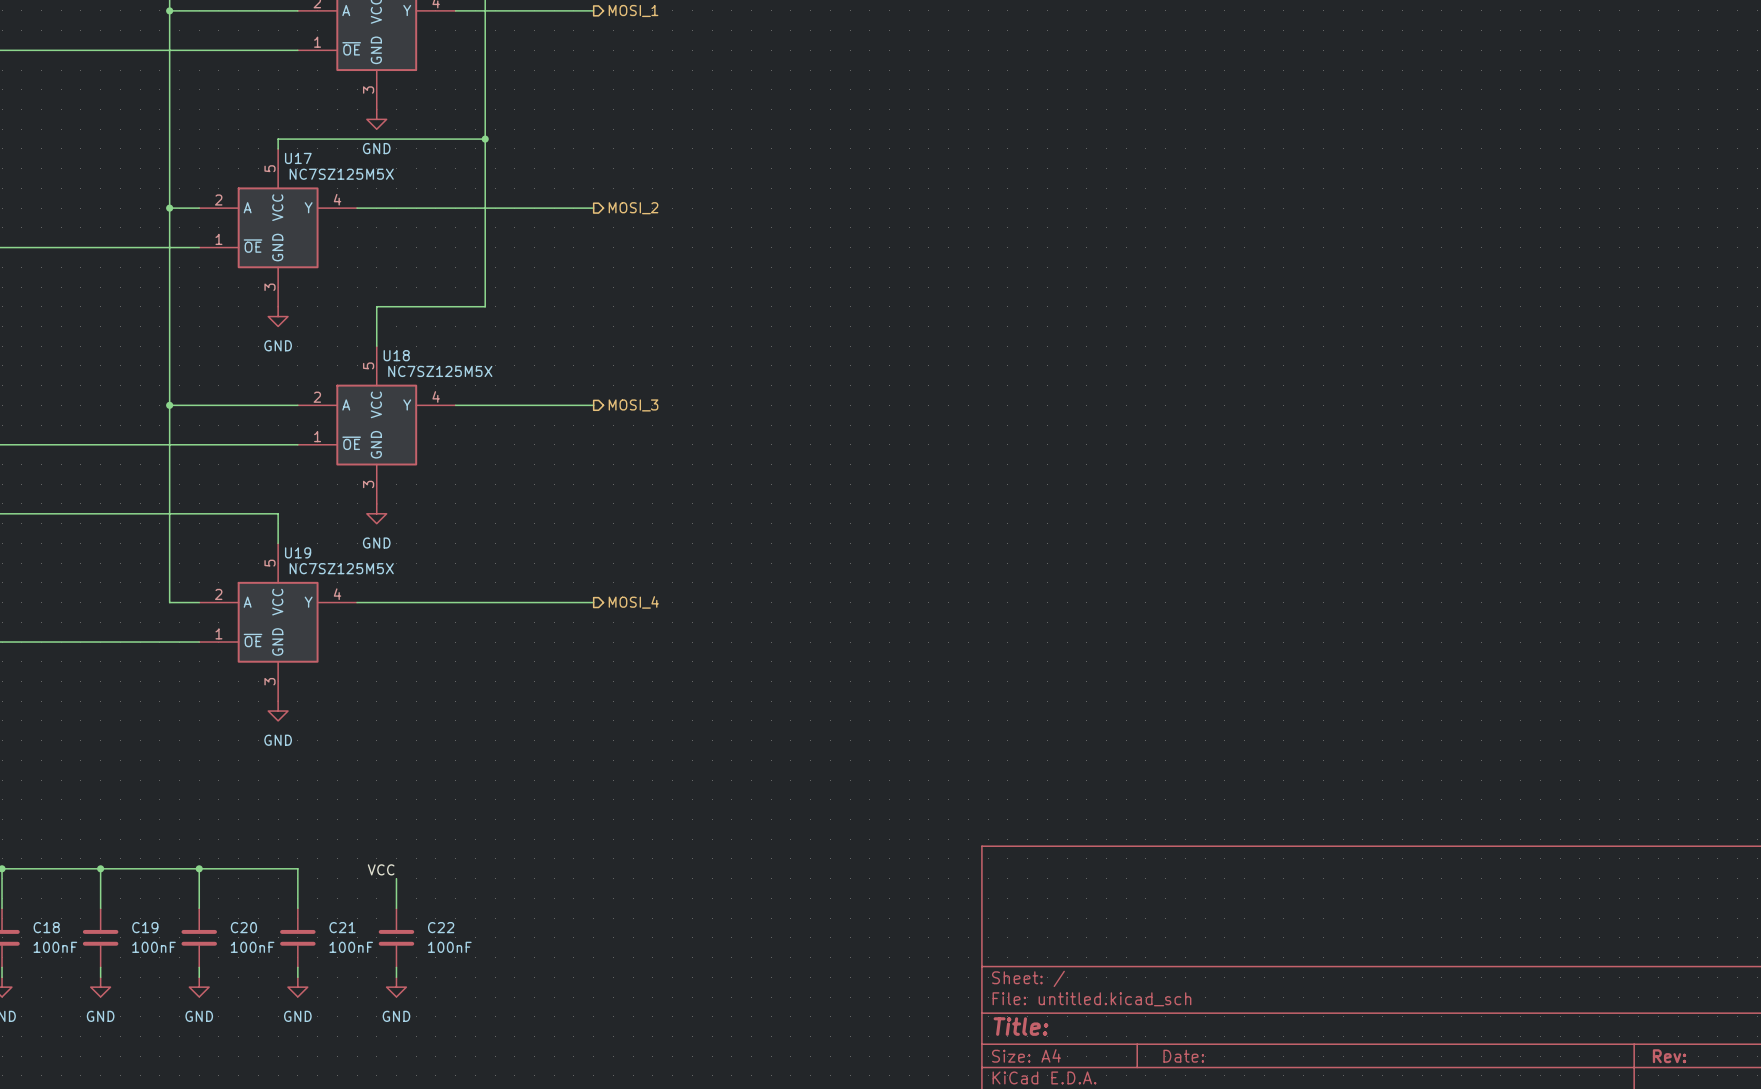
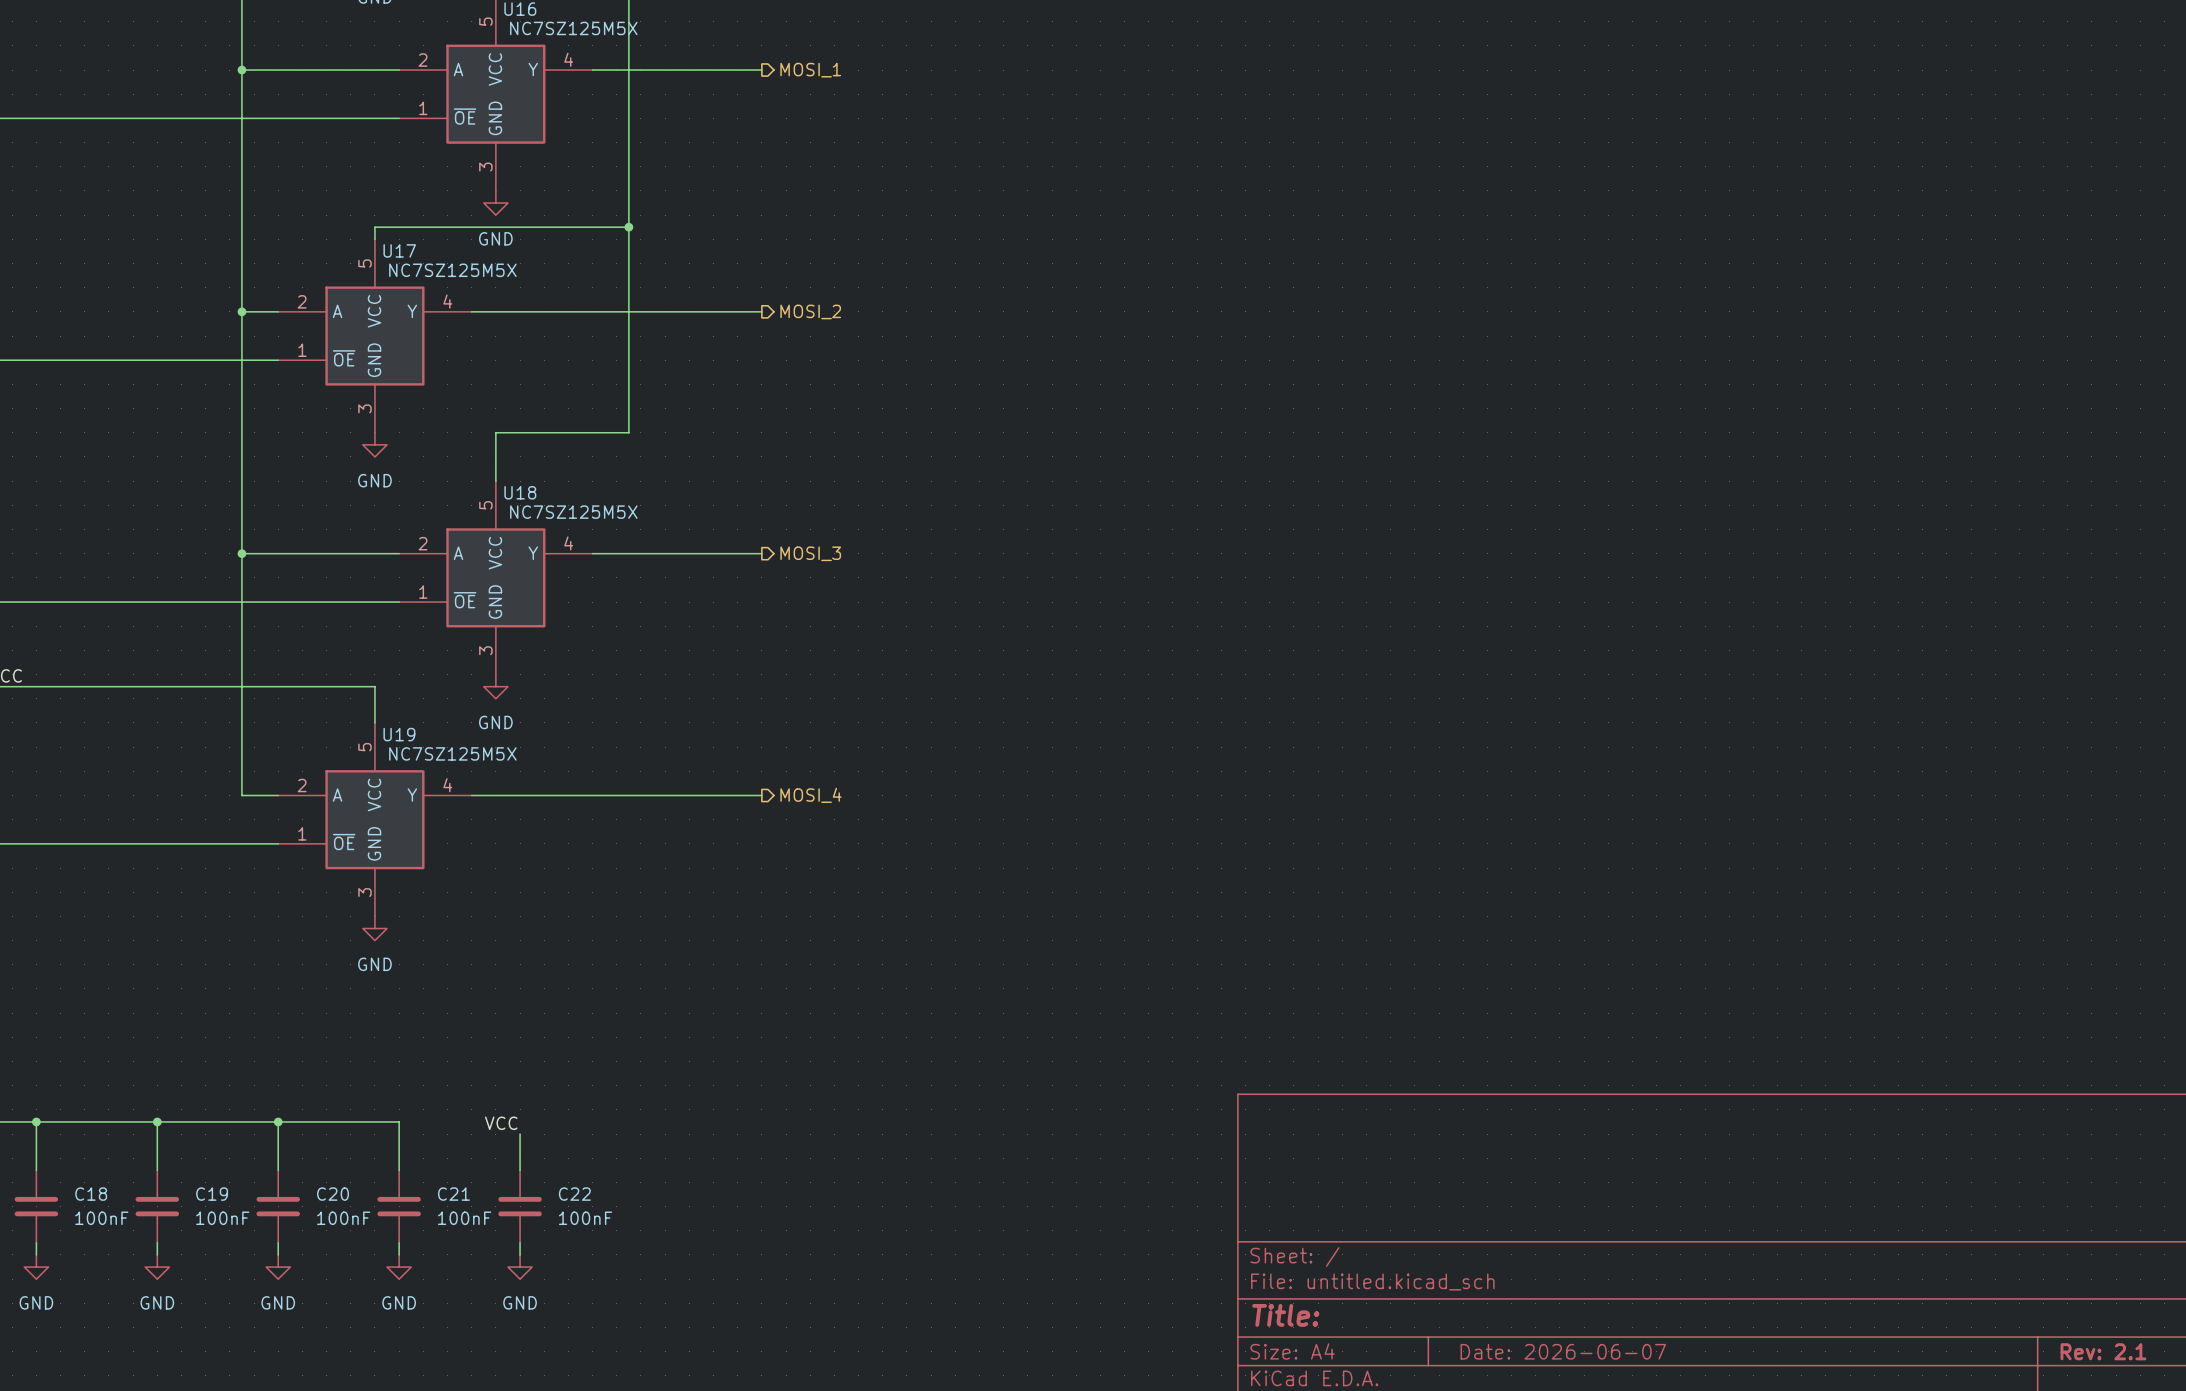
title block: Date: (1183, 1056) -> Date: 2026-06-07 (1563, 1351)
title block: Rev: (1669, 1056) -> Rev: 2.1 (2103, 1351)

